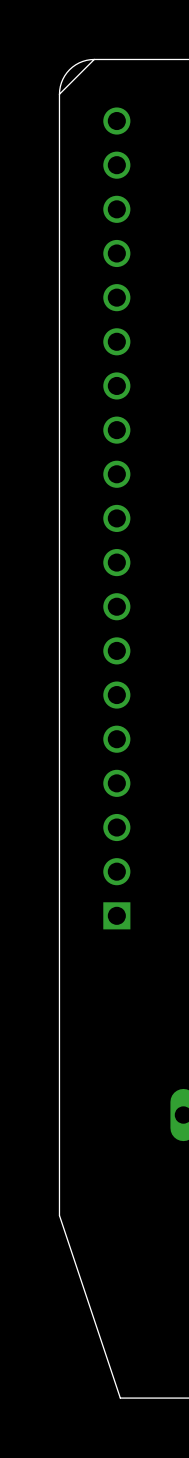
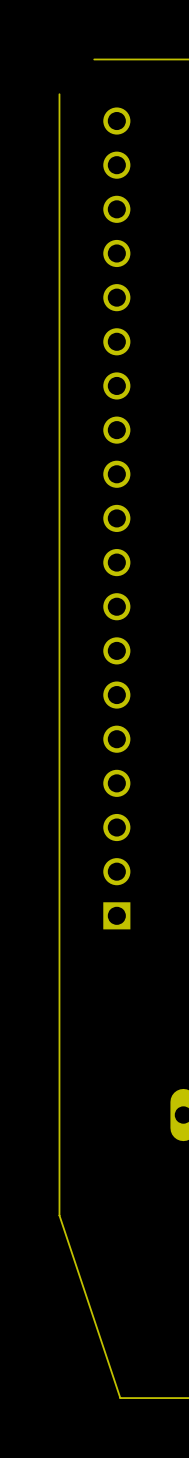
board edge: (94, 59) (59, 94) (62, 79) (69, 69) (79, 62) (94, 59) -> none

